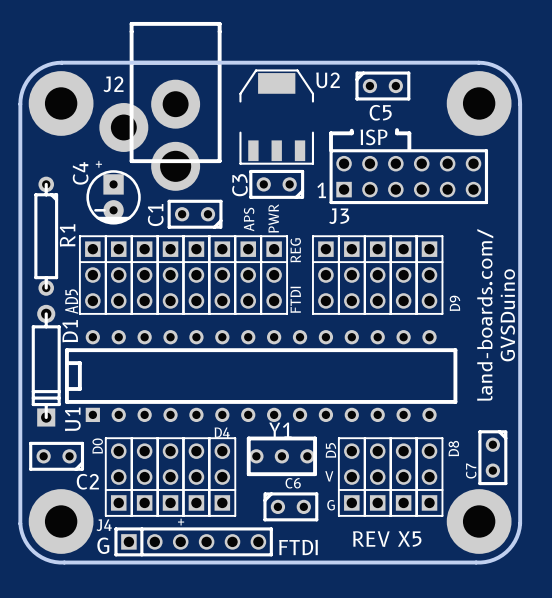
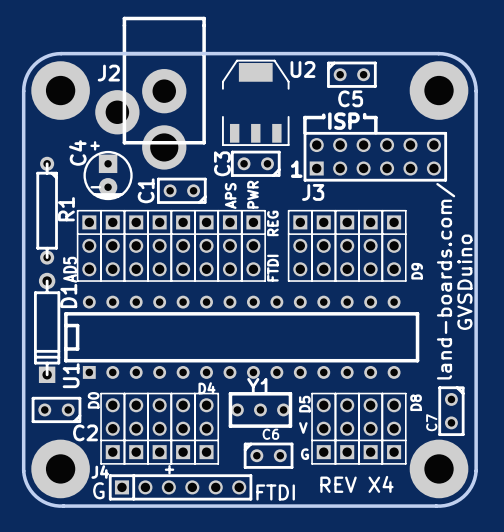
text: REV X5 (387, 539) -> REV X4 (356, 484)

